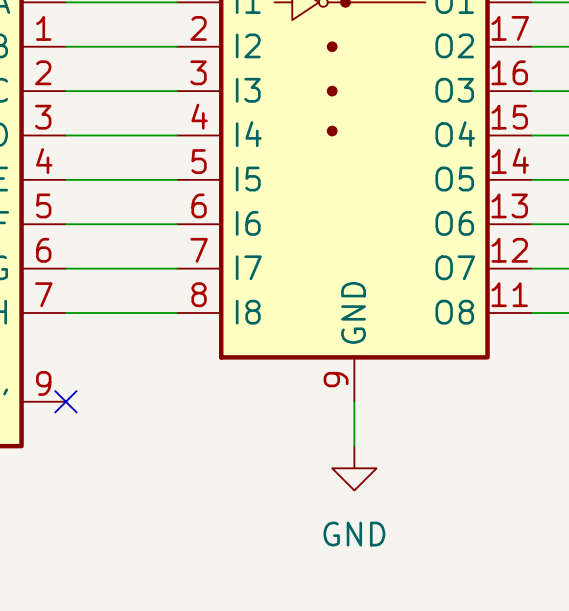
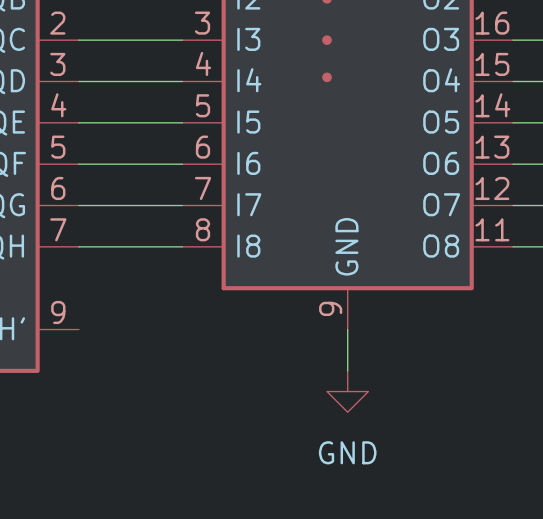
no-connect mark: (65, 401) -> none

